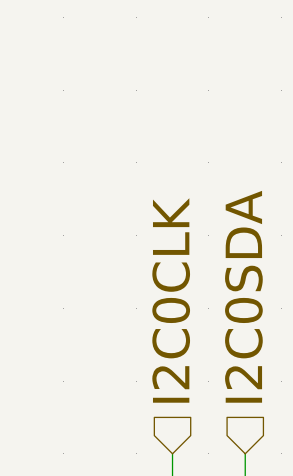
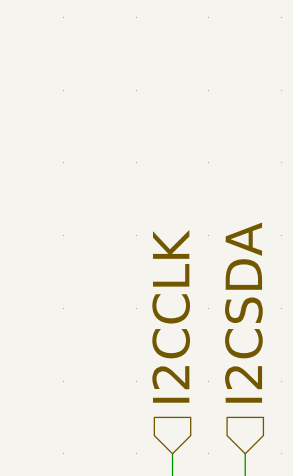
hierarchical label: I2C0SDA (243, 296) -> I2CSDA (243, 312)
hierarchical label: I2C0CLK (171, 300) -> I2CCLK (171, 316)

